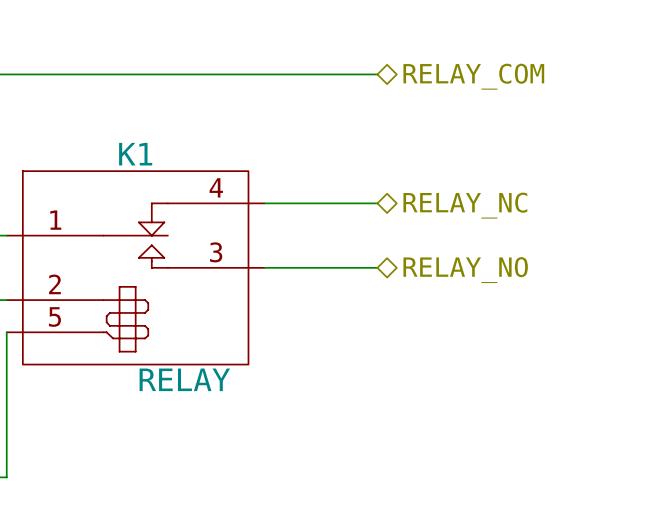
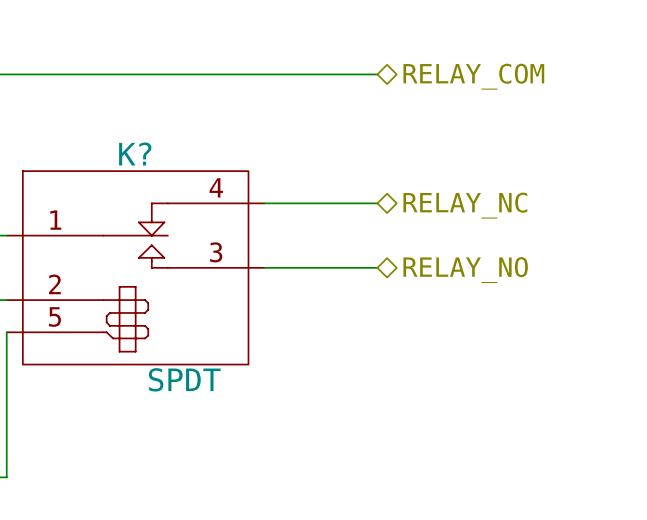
K1 name: K1 (135, 154) -> K? (135, 153)
K1 value: RELAY (184, 379) -> SPDT (184, 379)

